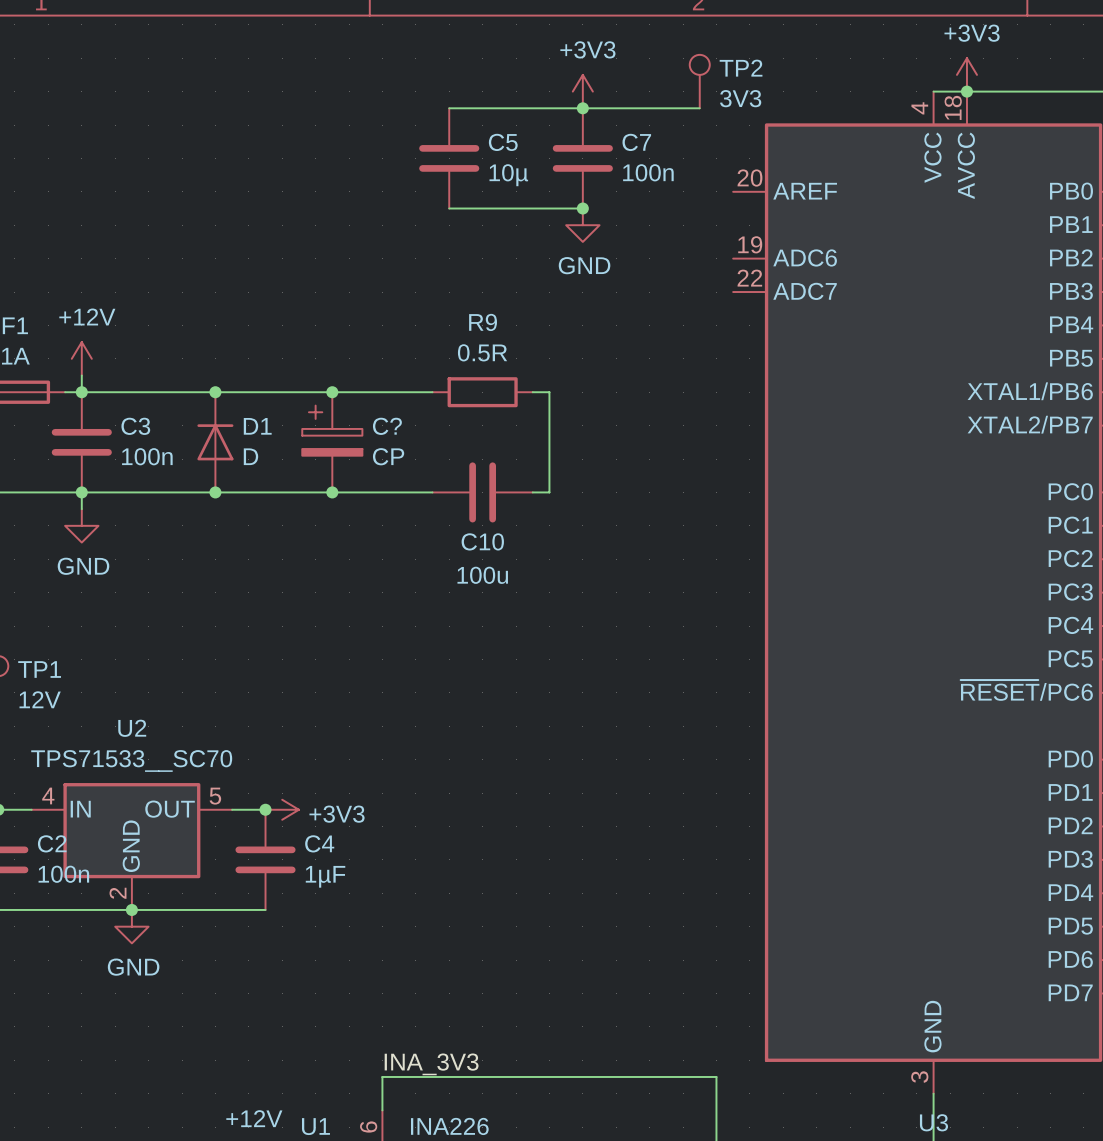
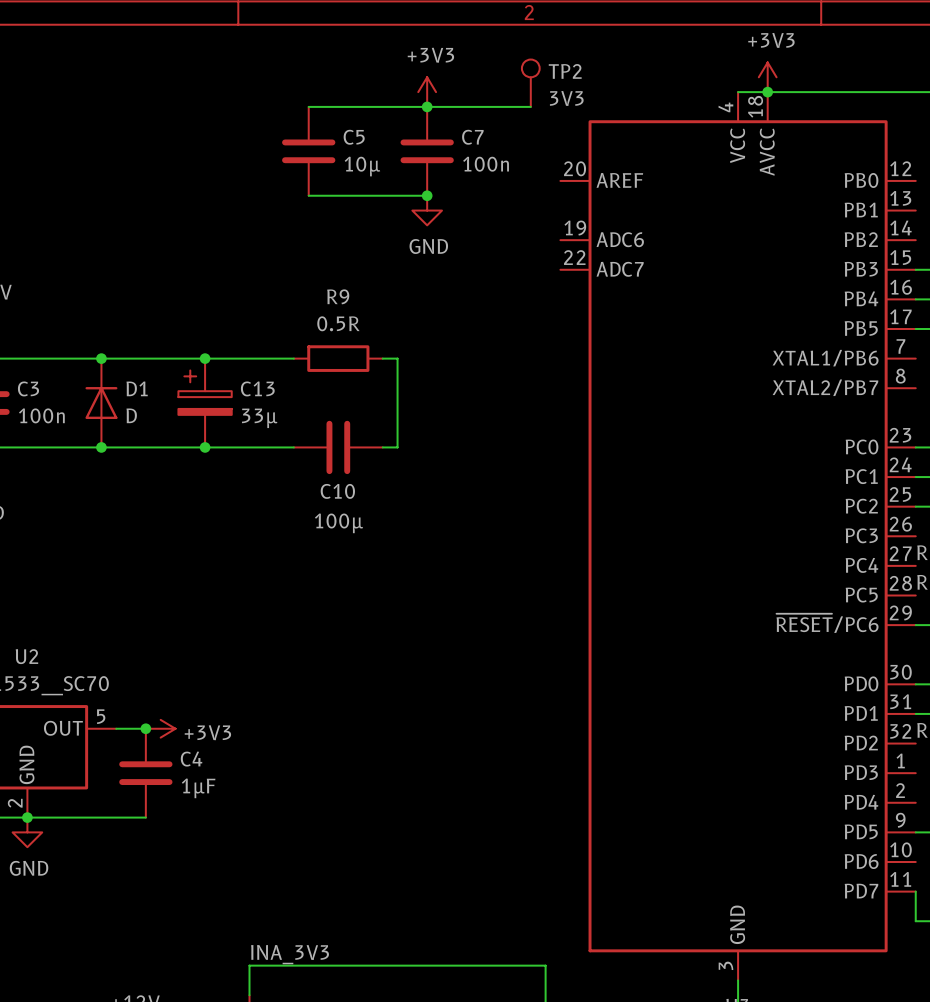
C? name: C? (387, 426) -> C13 (257, 388)
C? value: CP (388, 456) -> 33µ (259, 418)
C10 value: 100u (482, 575) -> 100µ (339, 523)

